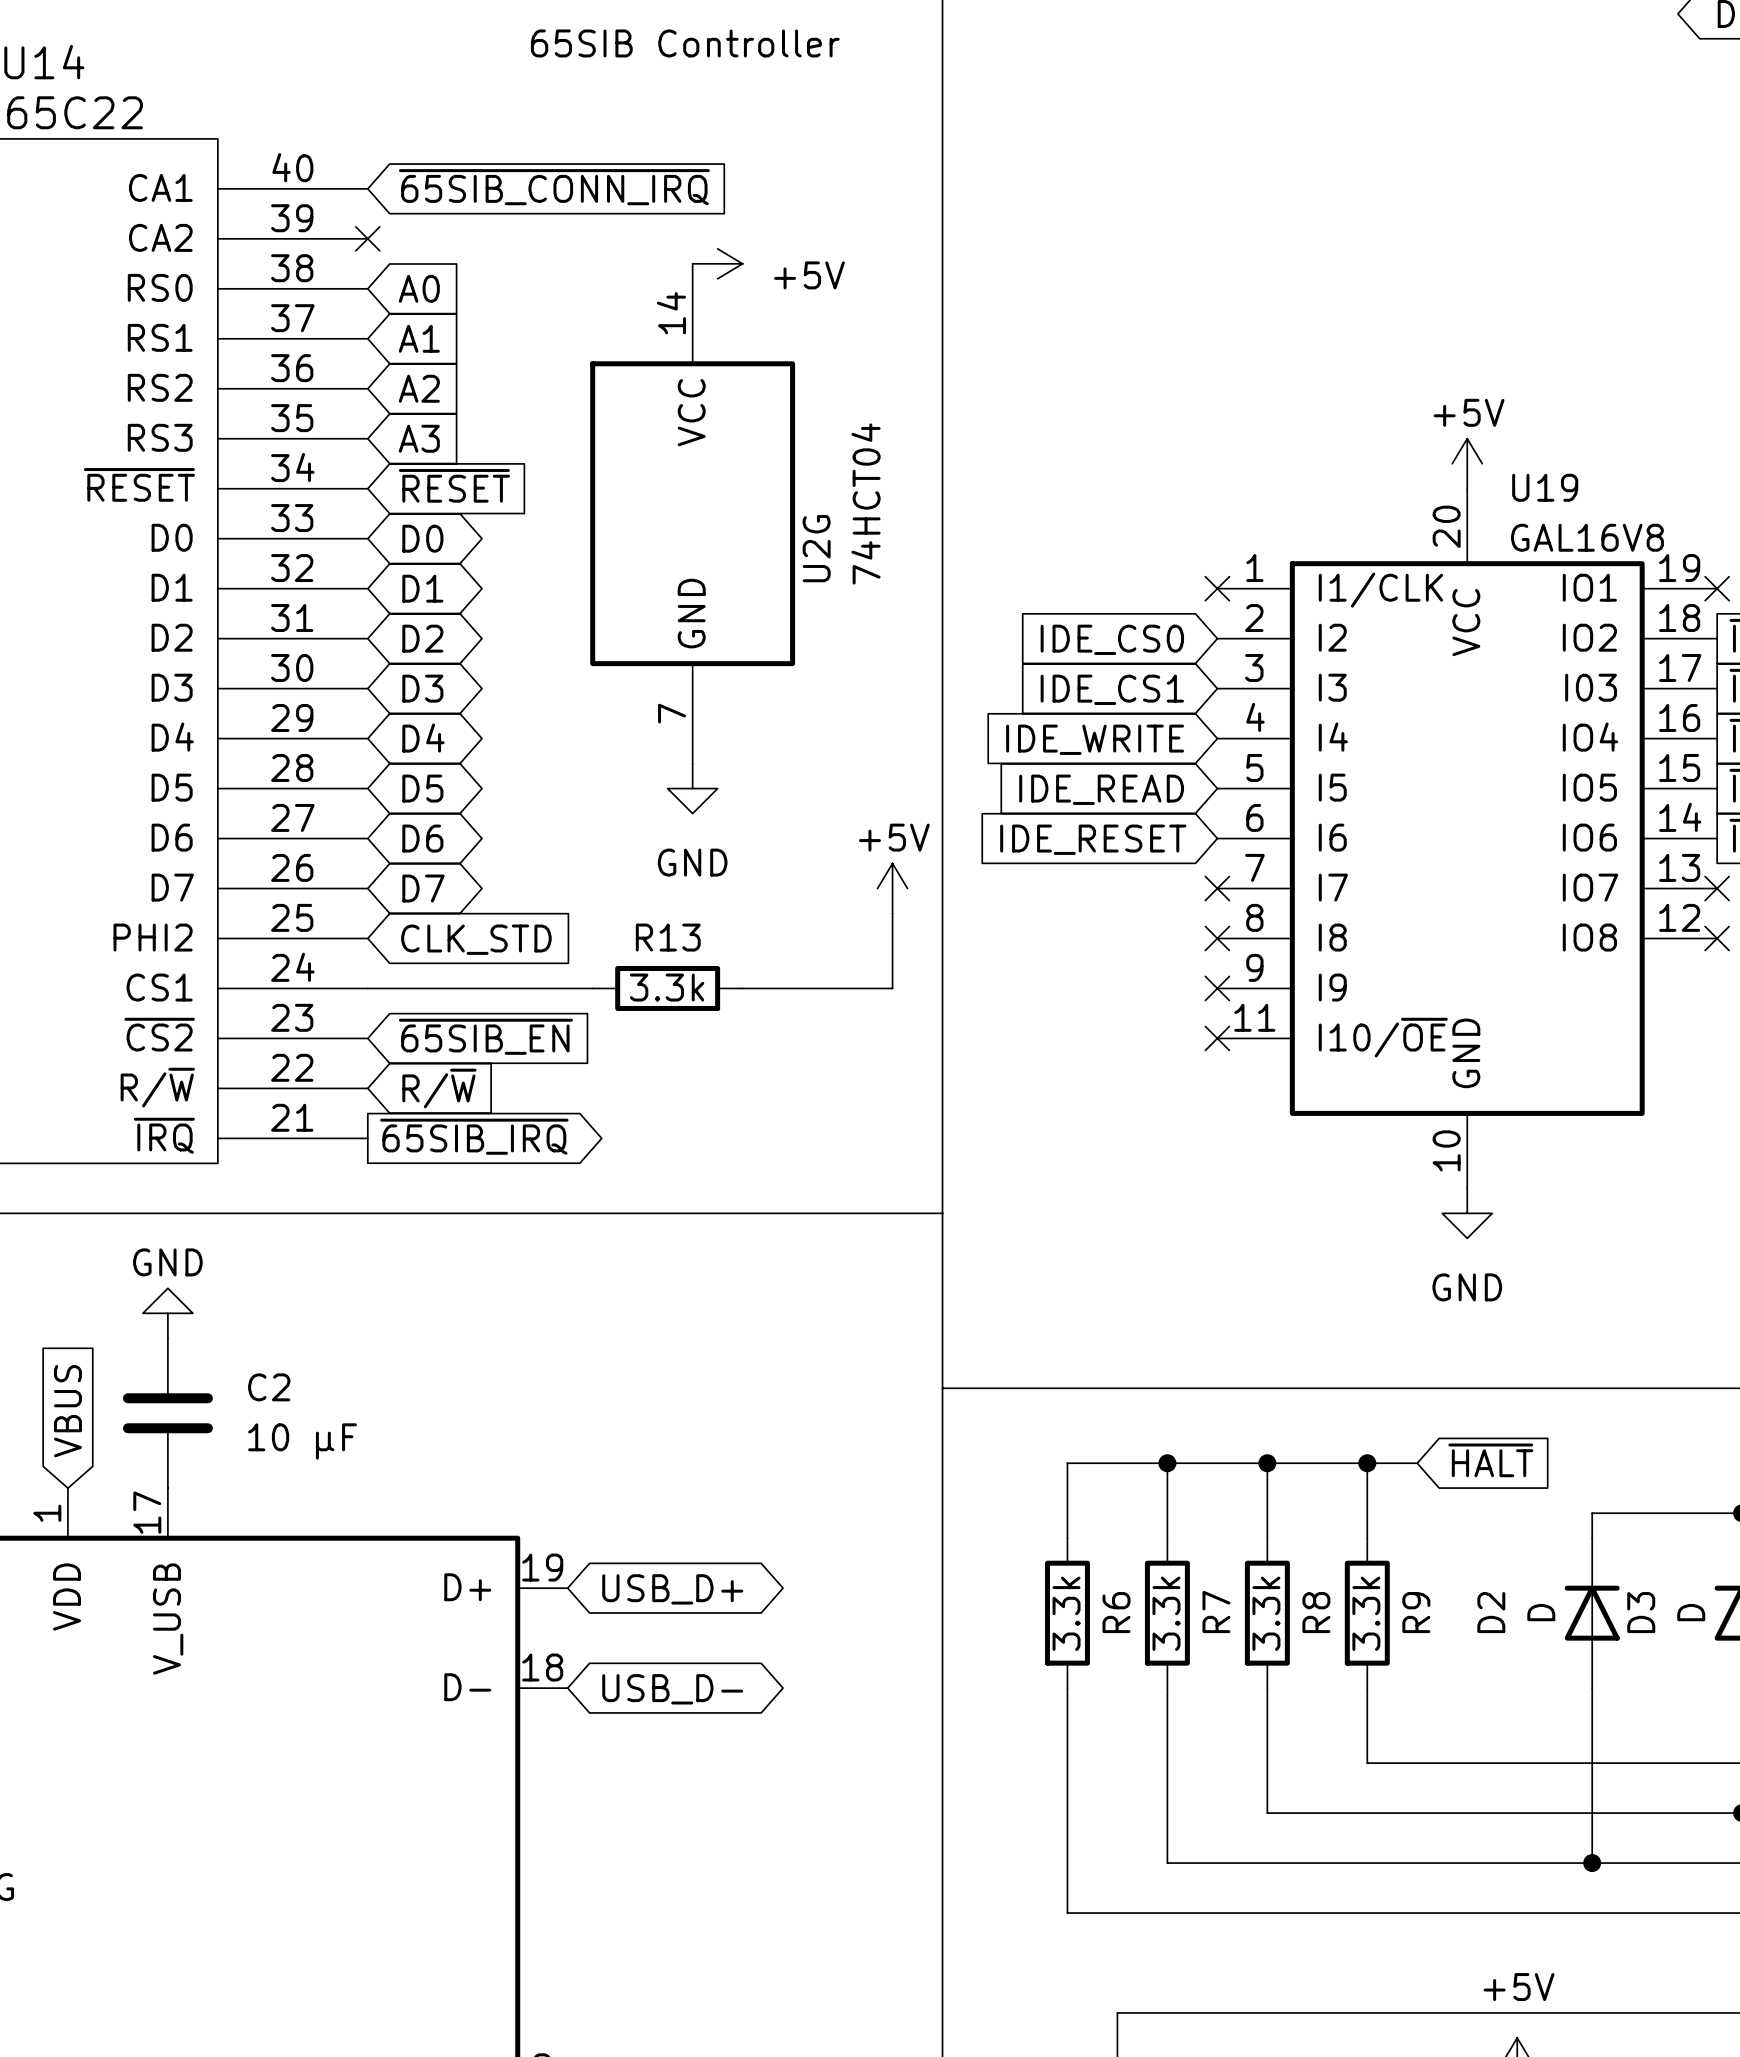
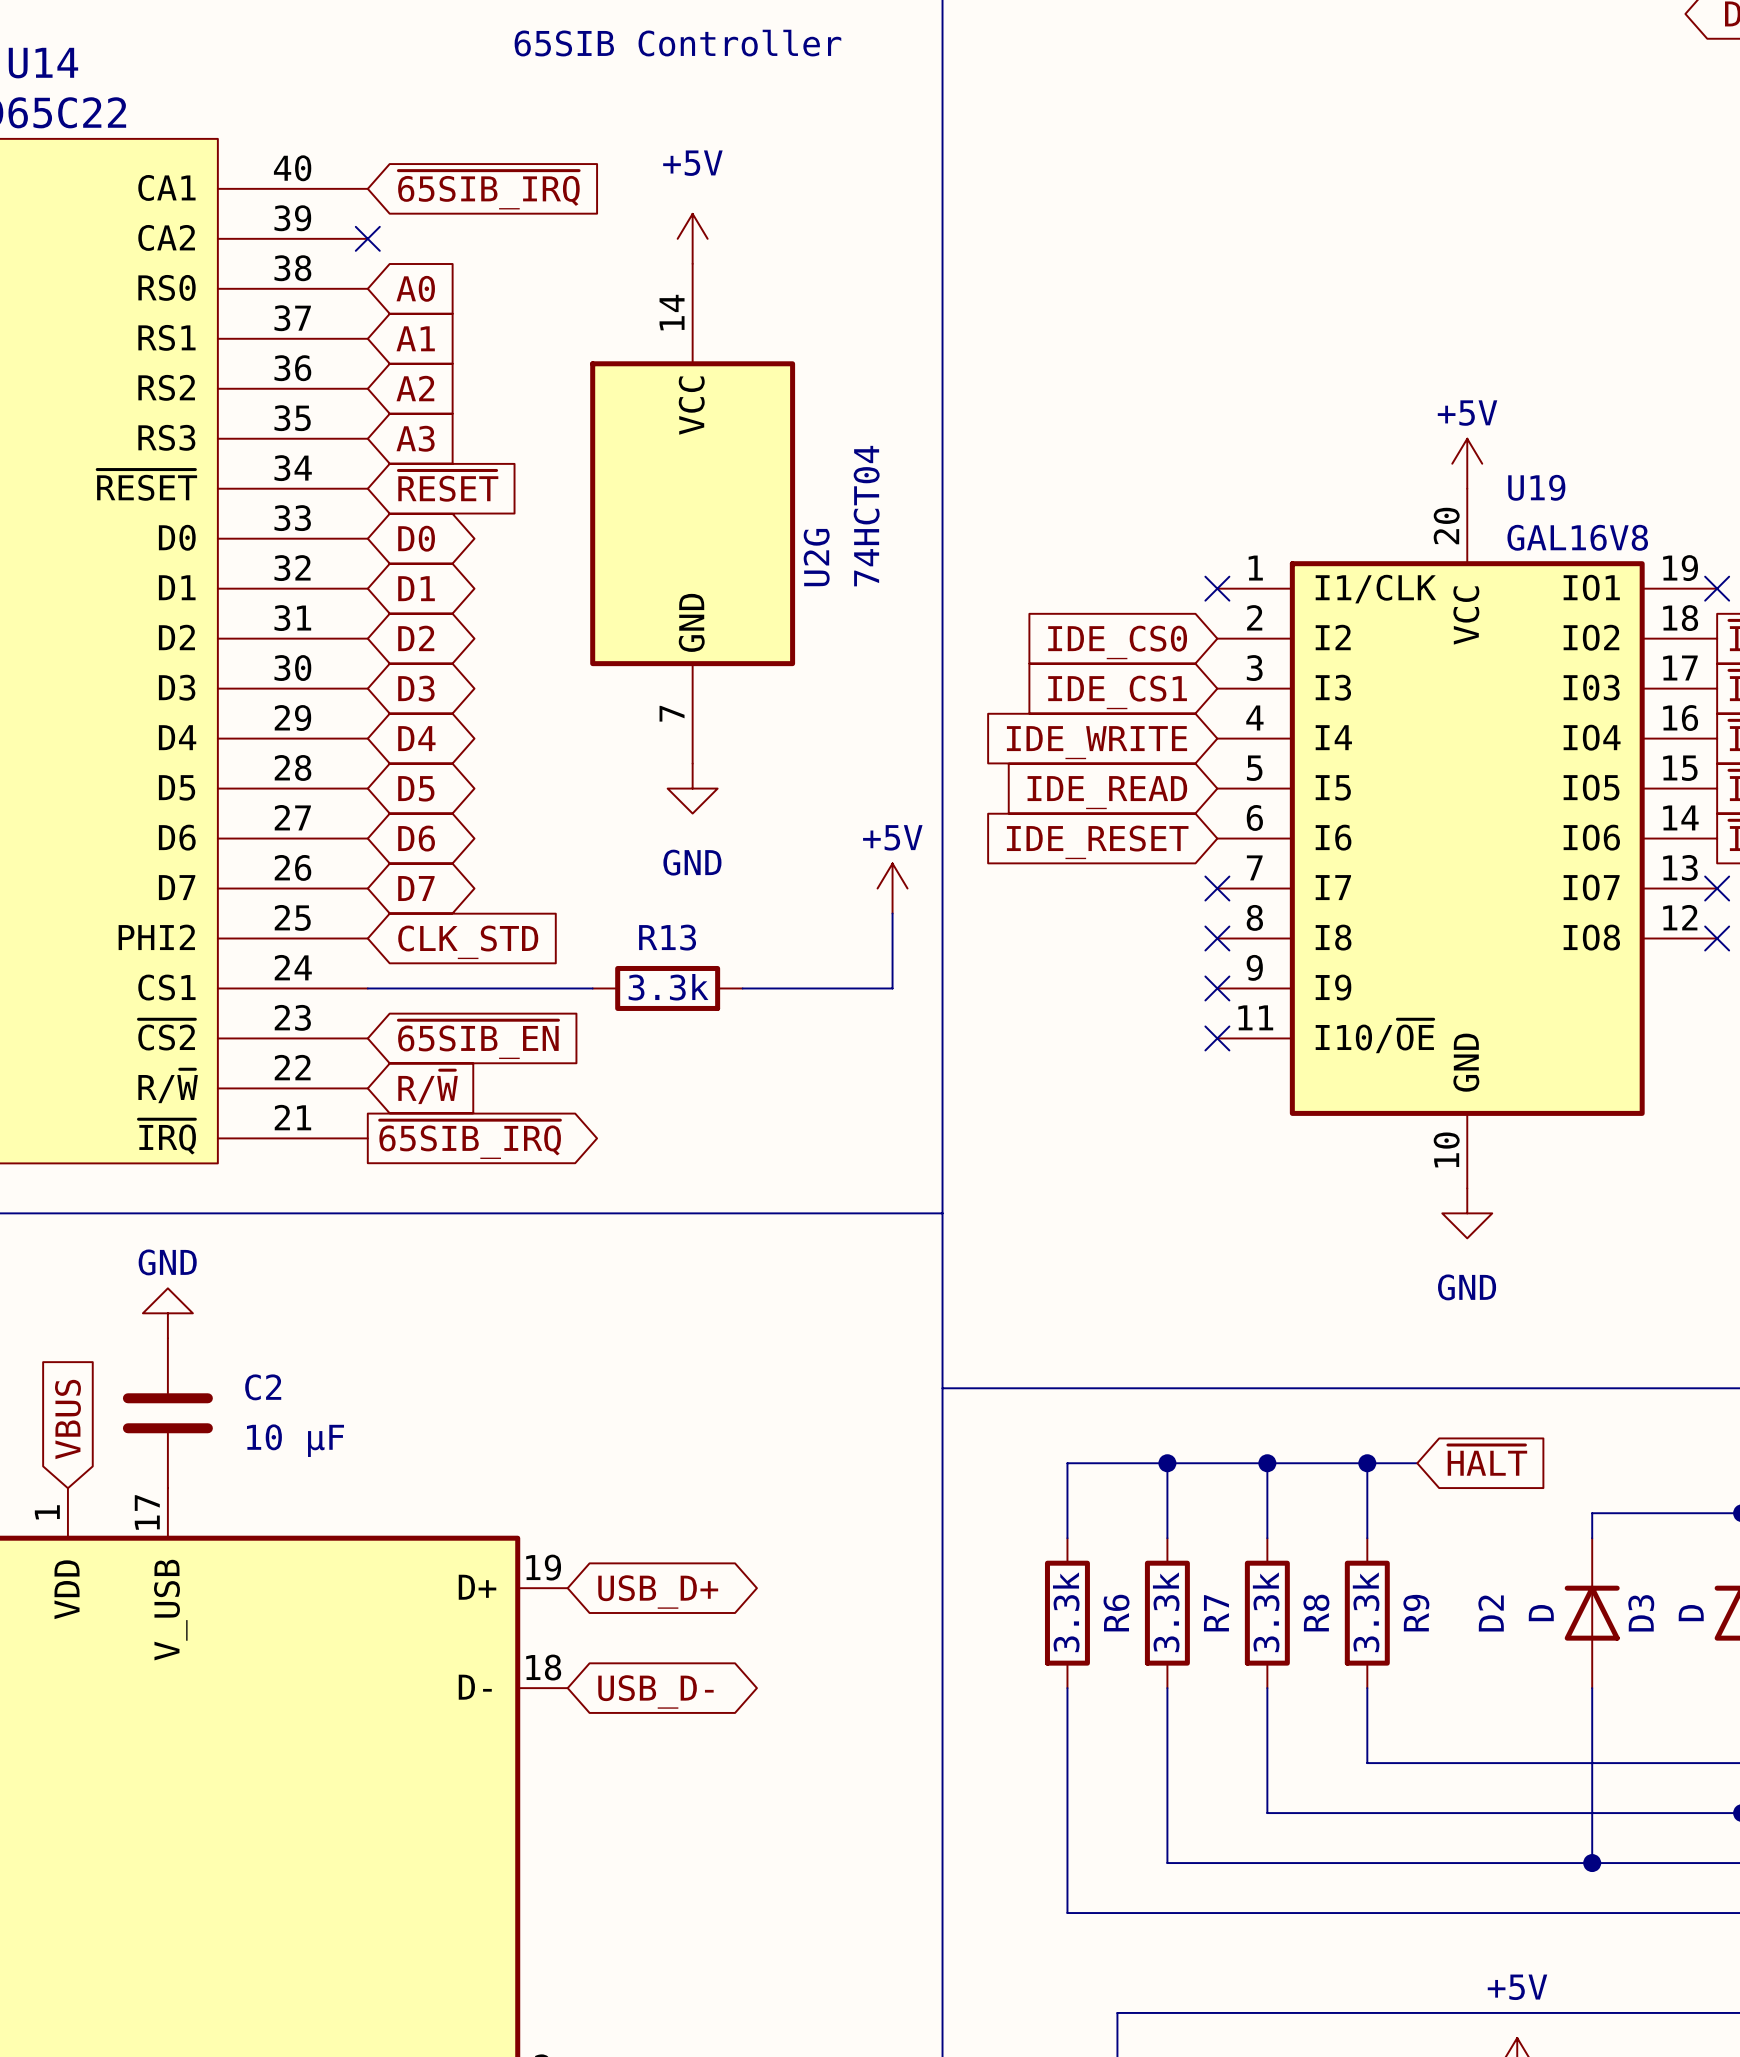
global label: ~{65SIB_CONN_IRQ} (554, 187) -> ~{65SIB_IRQ} (488, 190)
power symbol rotation: 0° (717, 263) -> 90° counterclockwise (692, 238)
power symbol position: +5V (717, 263) -> +5V (692, 238)

